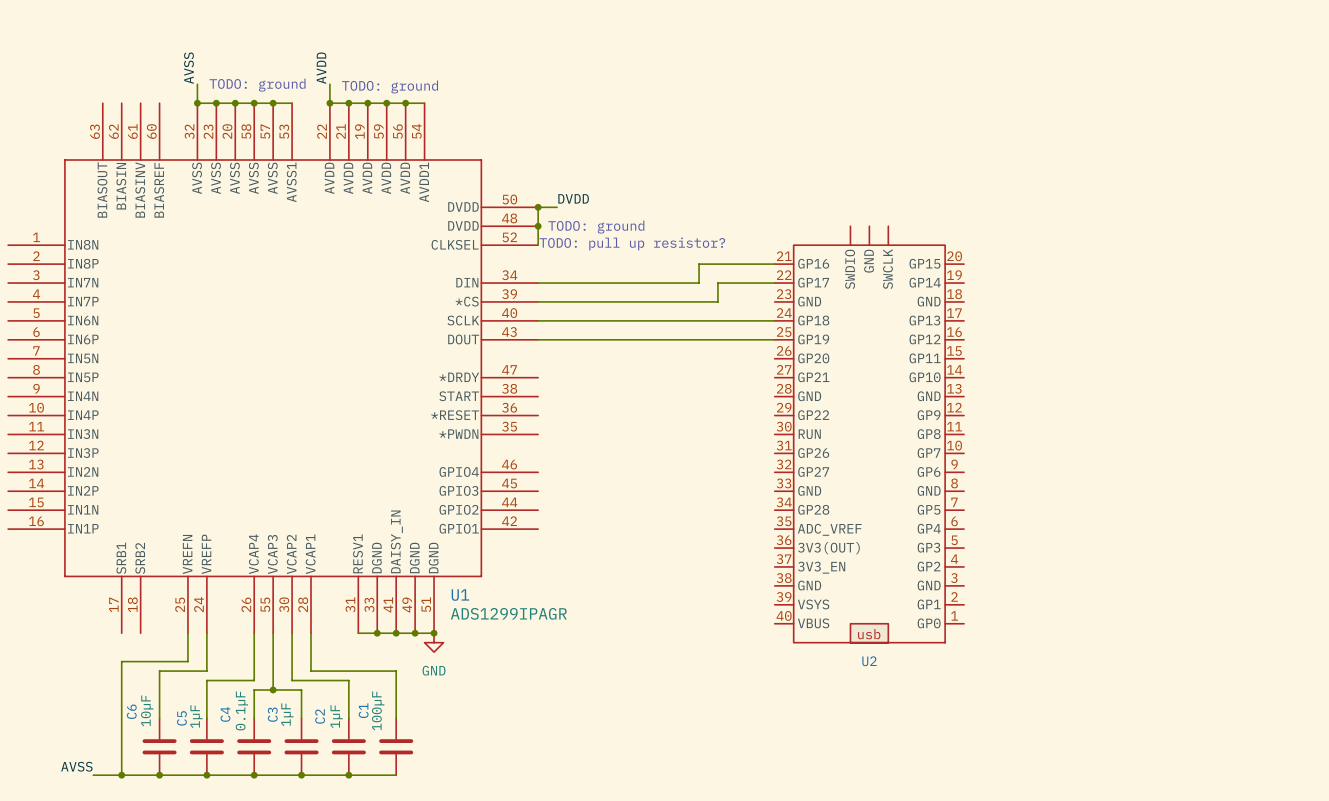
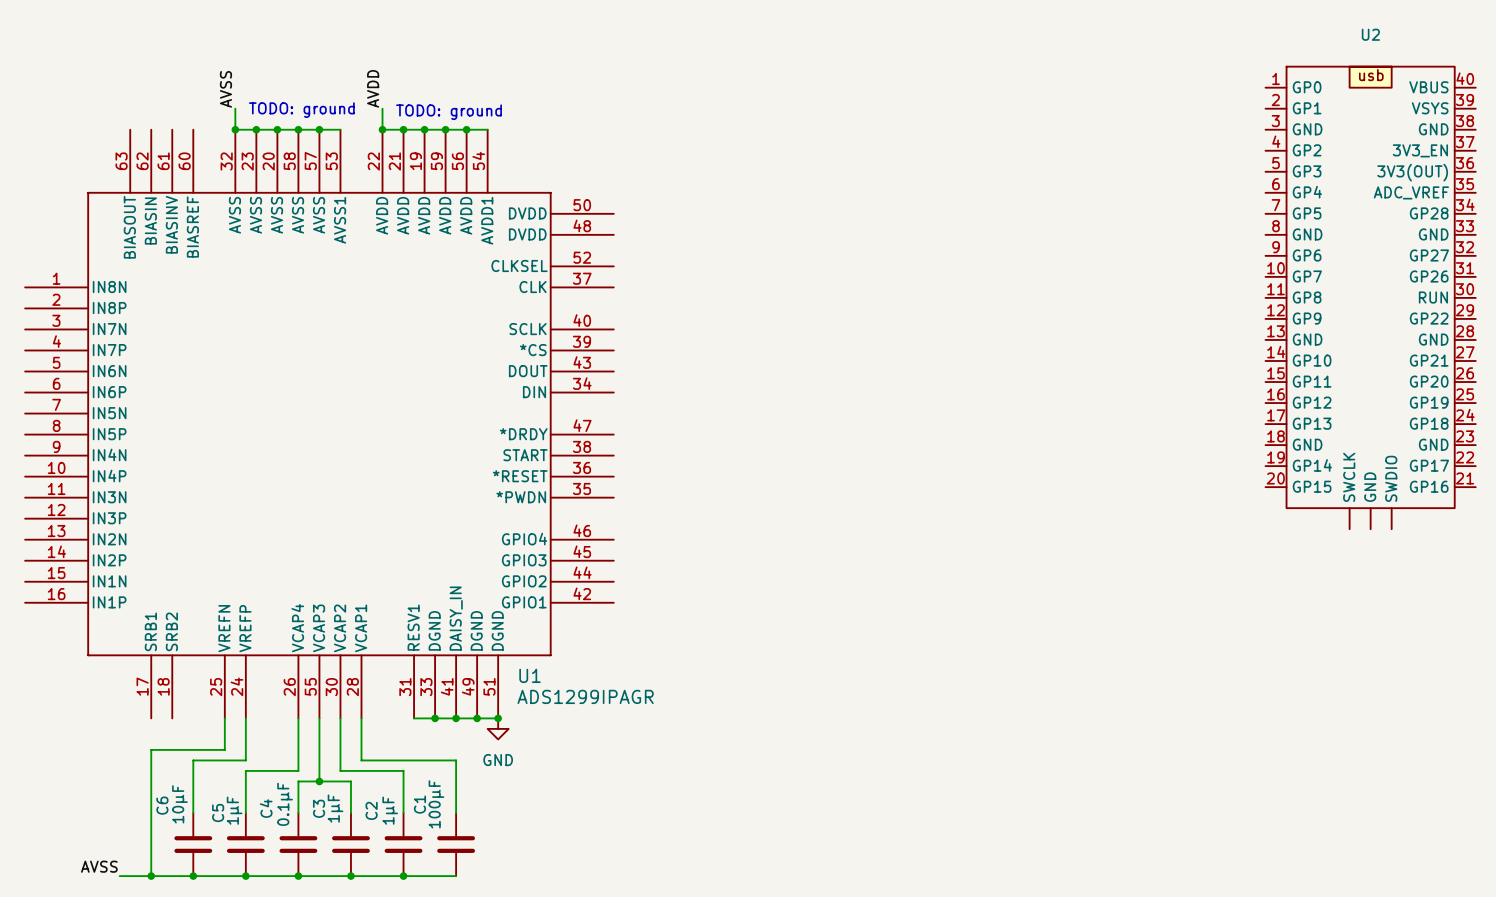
U1 symbol: [8, 103, 539, 634] -> [25, 129, 614, 719]
label: DVDD (573, 198) -> none
junction: (538, 207) -> none
wire: (557, 207) (538, 207) (538, 245) -> none
junction: (538, 226) -> none
text: TODO: ground (596, 227) -> none
text: TODO: pull up resistor? (632, 243) -> none
wire: (774, 264) (699, 264) (699, 283) (538, 283) -> none
wire: (774, 283) (717, 283) (717, 301) (538, 301) -> none
wire: (538, 320) (774, 320) -> none
wire: (538, 339) (774, 339) -> none
U2 position: (869, 434) -> (1370, 297)
U2 rotation: 0° (869, 443) -> 180° (1370, 287)

